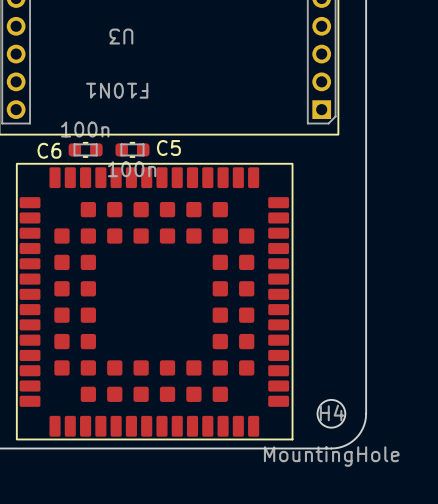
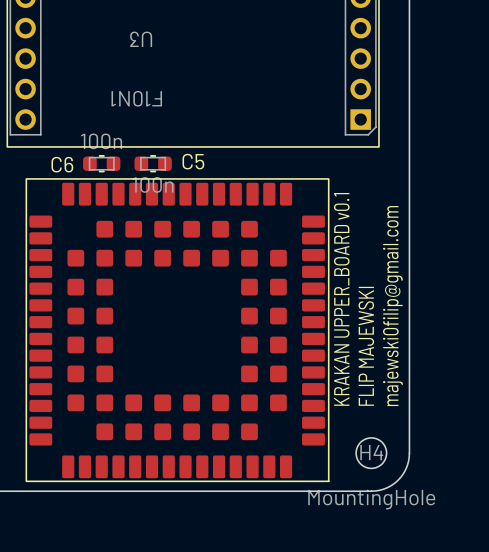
text: none -> KRAKAN UPPER_BOARD v0.1 (341, 299)
text: none -> majewski0filip@gmail.com (392, 306)
text: none -> FLIP MAJEWSKI (366, 346)

